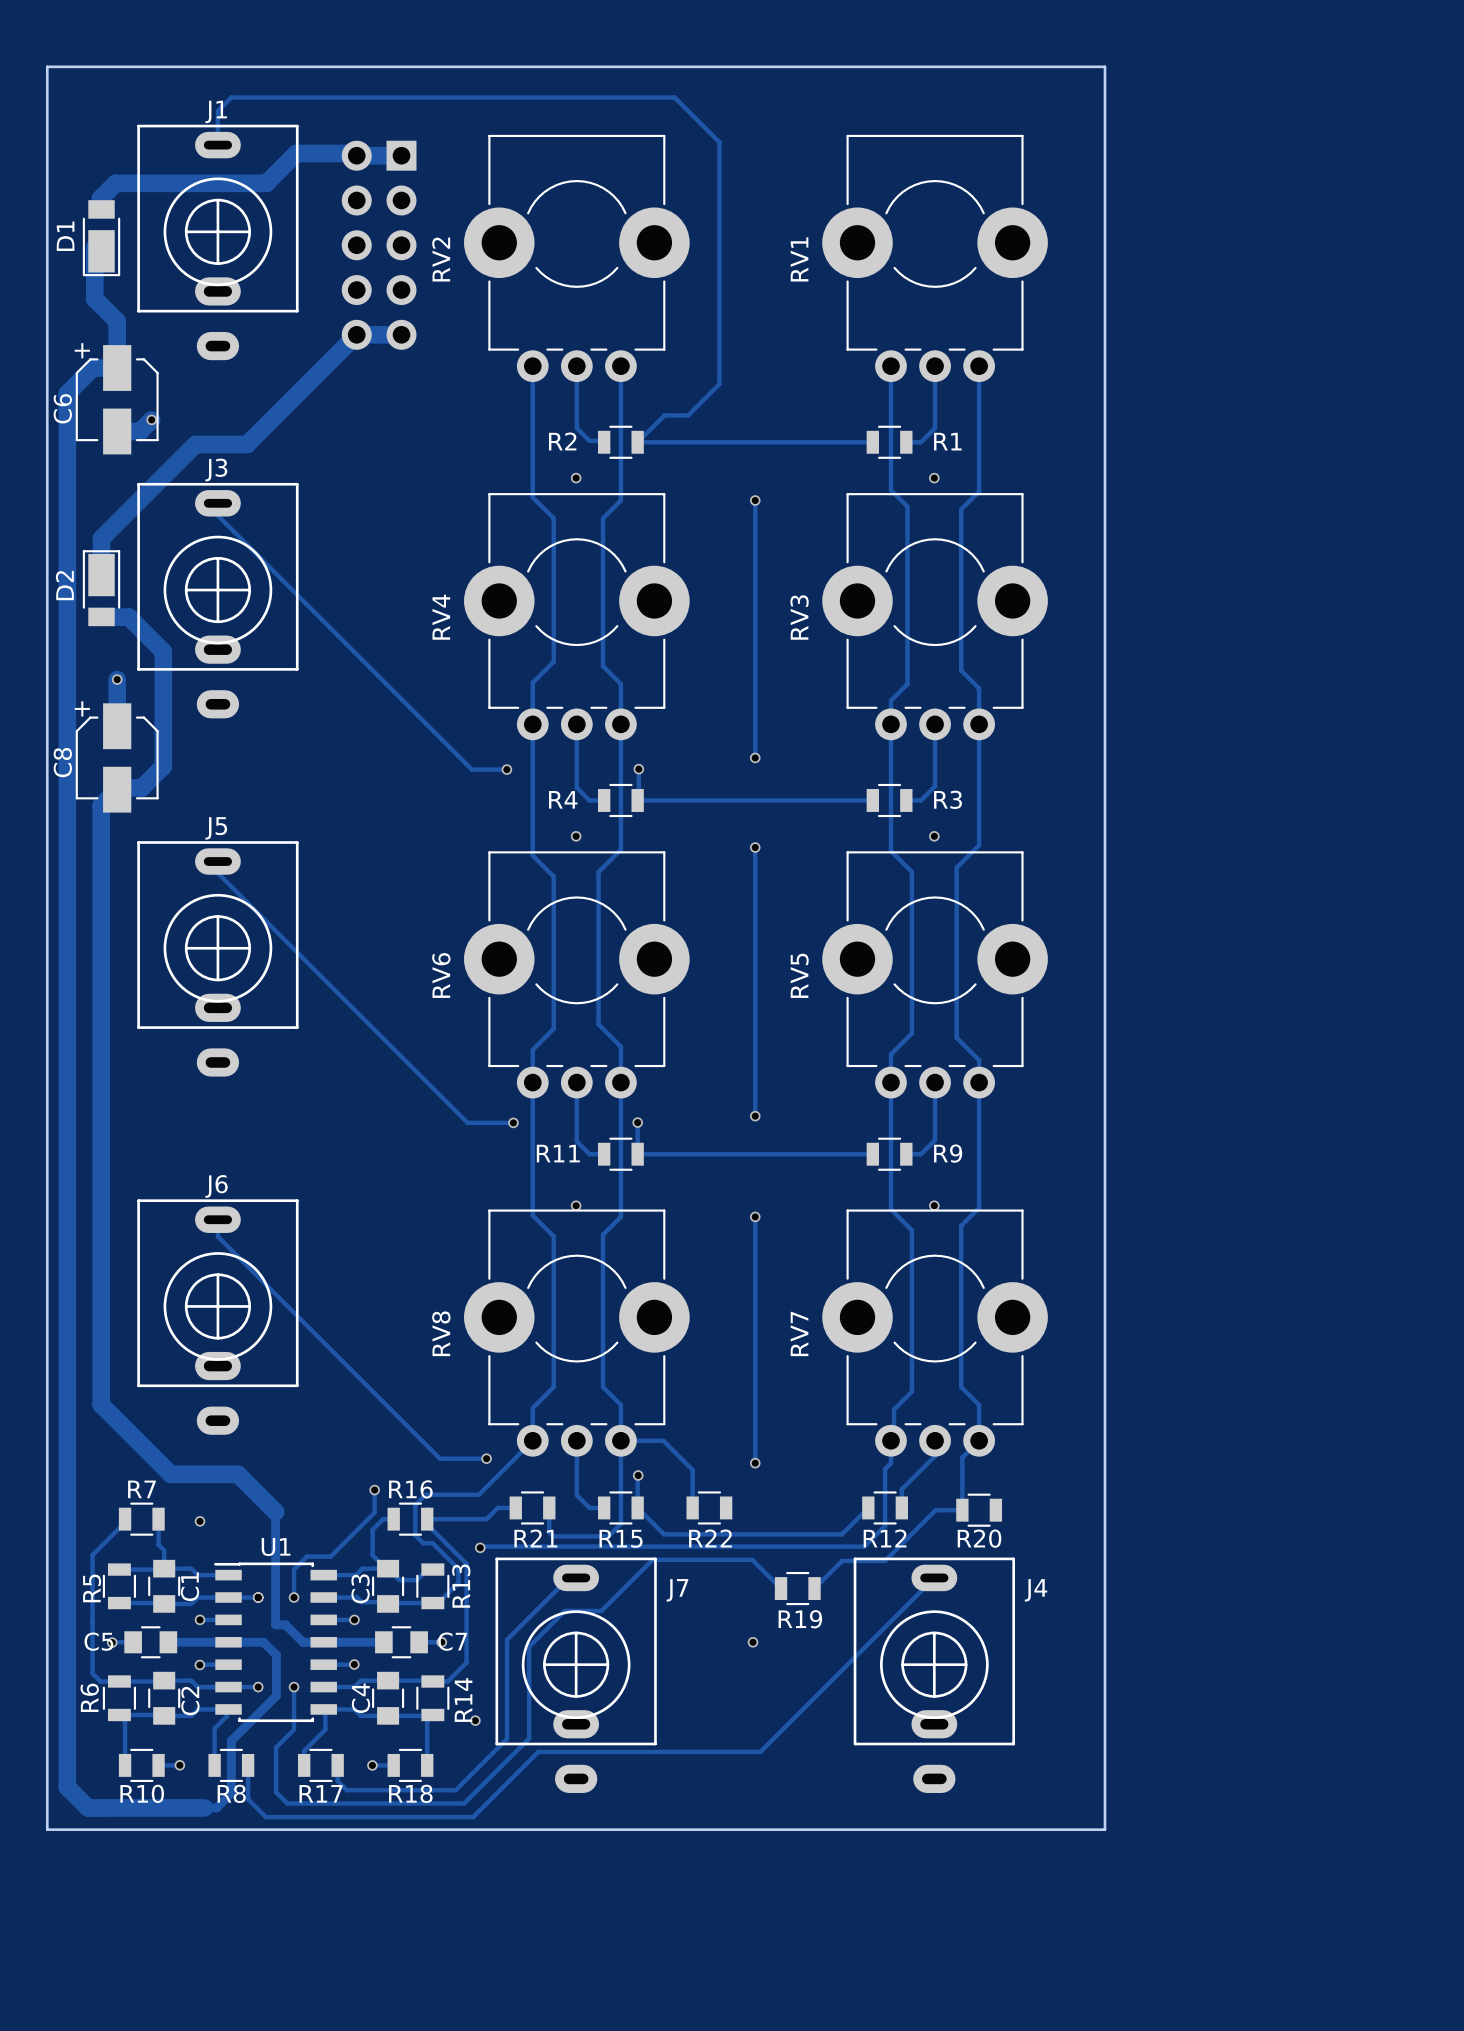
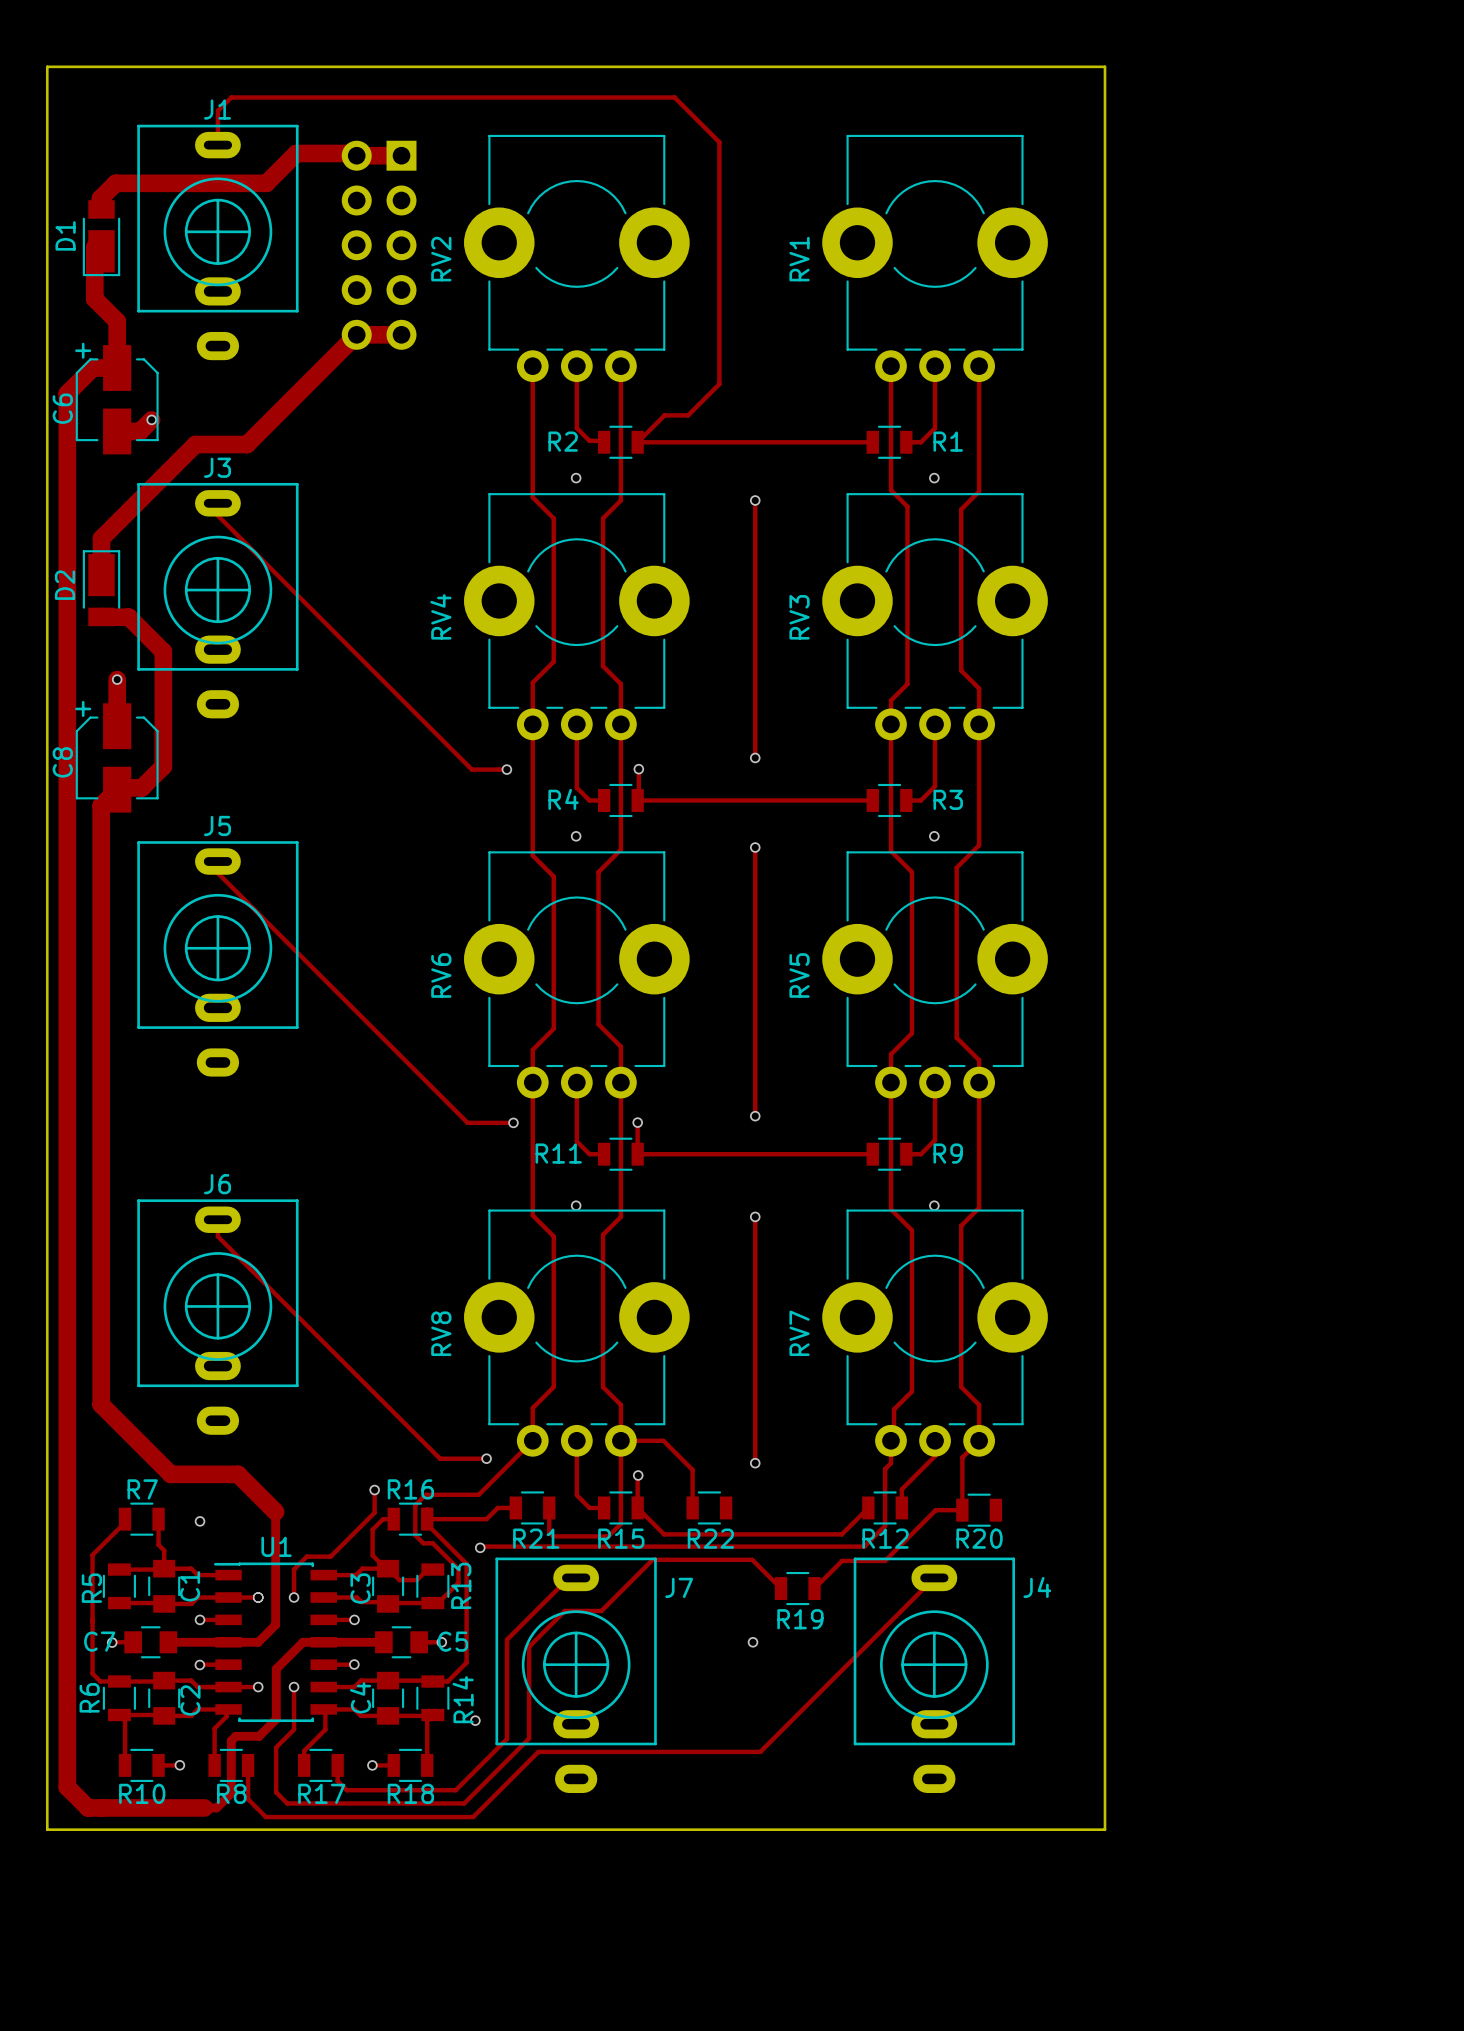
track: (275, 1624) (285, 1624) (303, 1642) -> (275, 1624) (258, 1642)
C5 name: C5 (98, 1641) -> C7 (99, 1641)
C7 name: C7 (452, 1641) -> C5 (453, 1641)
track: (258, 1642) (263, 1642) (276, 1655) (276, 1695) (235, 1736) -> (303, 1642) (276, 1668) (276, 1719) (259, 1736) (235, 1736)

